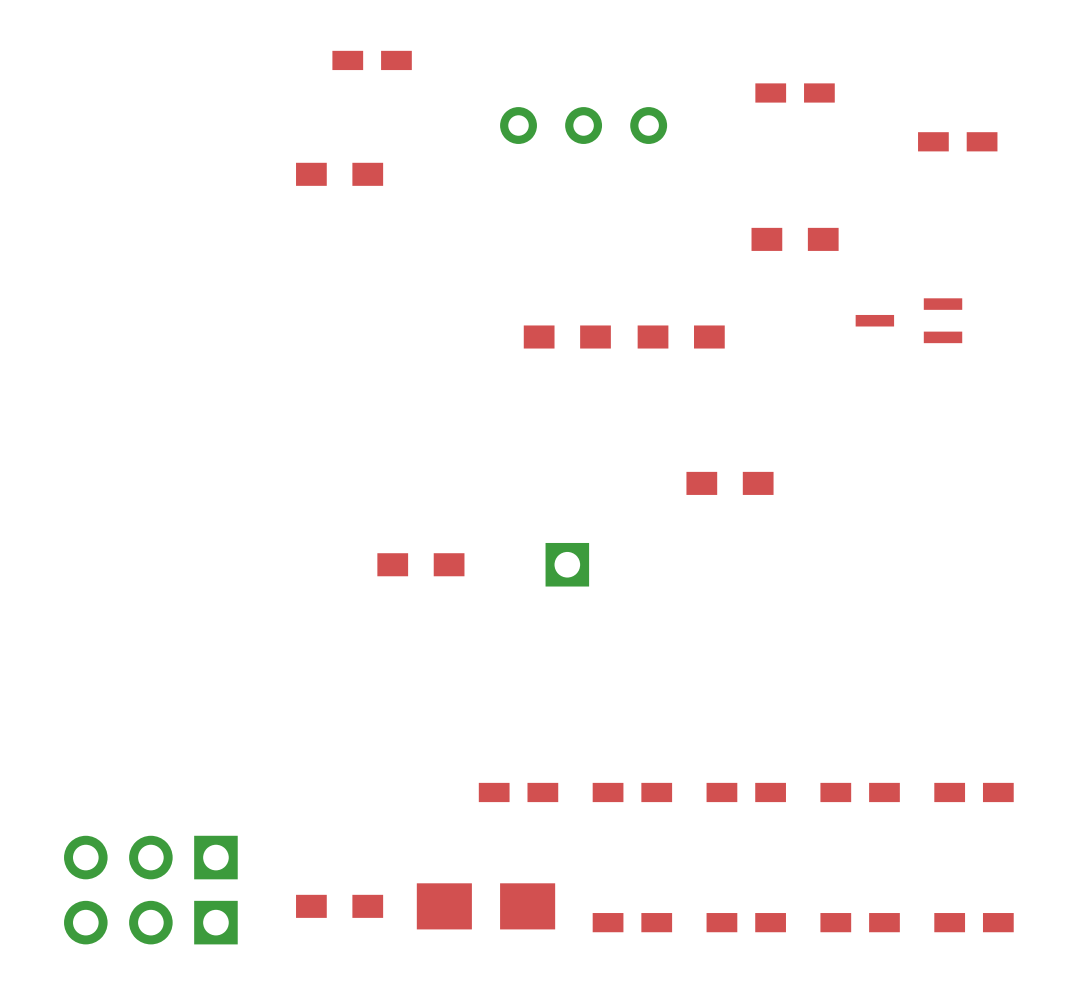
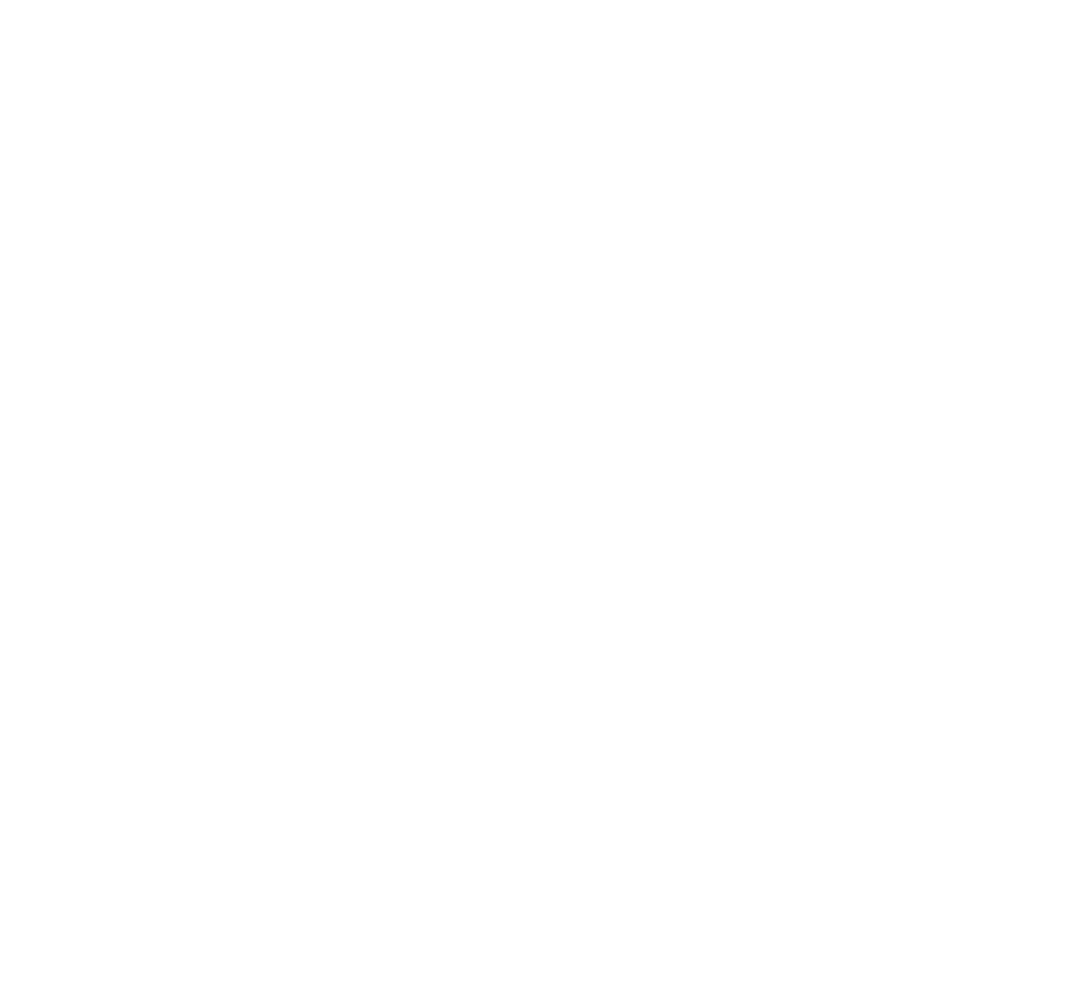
part: (372, 60) -> none
part: (795, 92) -> none
part: (583, 125) -> none
part: (957, 141) -> none
part: (339, 174) -> none
part: (795, 239) -> none
part: (908, 320) -> none
part: (567, 337) -> none
part: (681, 337) -> none
part: (730, 483) -> none
part: (420, 564) -> none
part: (567, 564) -> none
part: (518, 792) -> none
part: (632, 792) -> none
part: (746, 792) -> none
part: (860, 792) -> none
part: (974, 792) -> none
part: (150, 857) -> none
part: (339, 906) -> none
part: (485, 906) -> none
part: (150, 922) -> none
part: (632, 922) -> none
part: (746, 922) -> none
part: (860, 922) -> none
part: (974, 922) -> none

